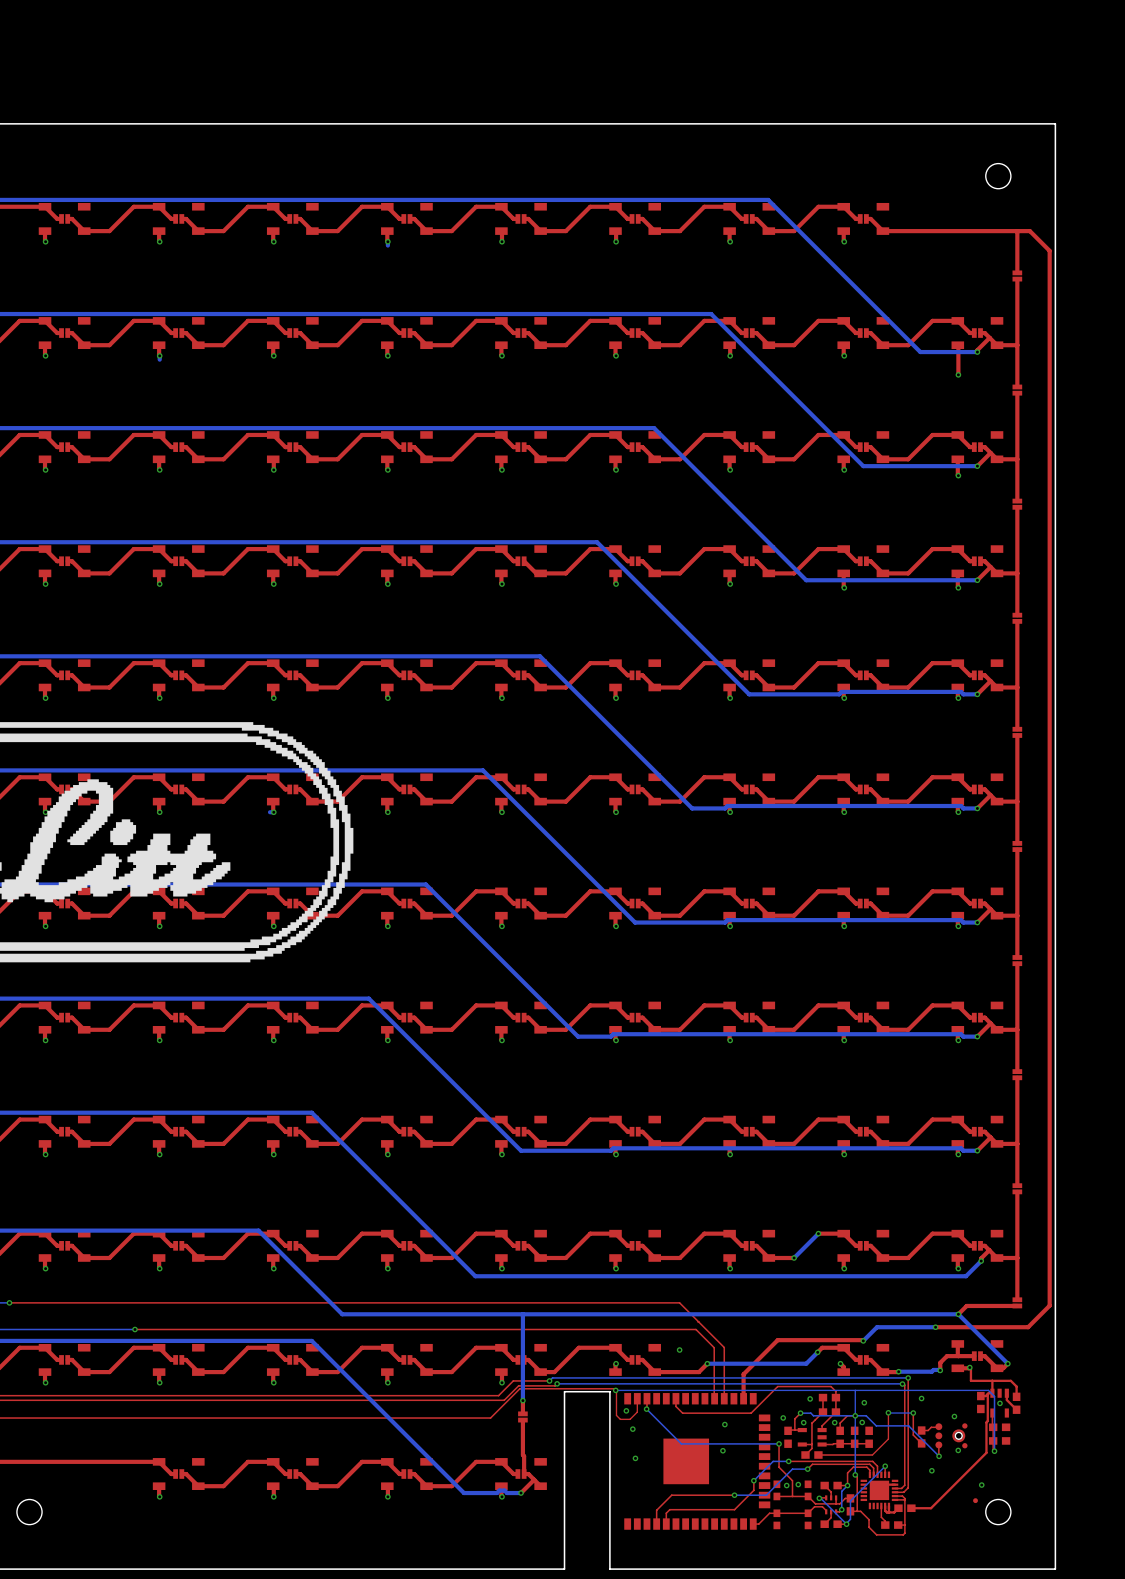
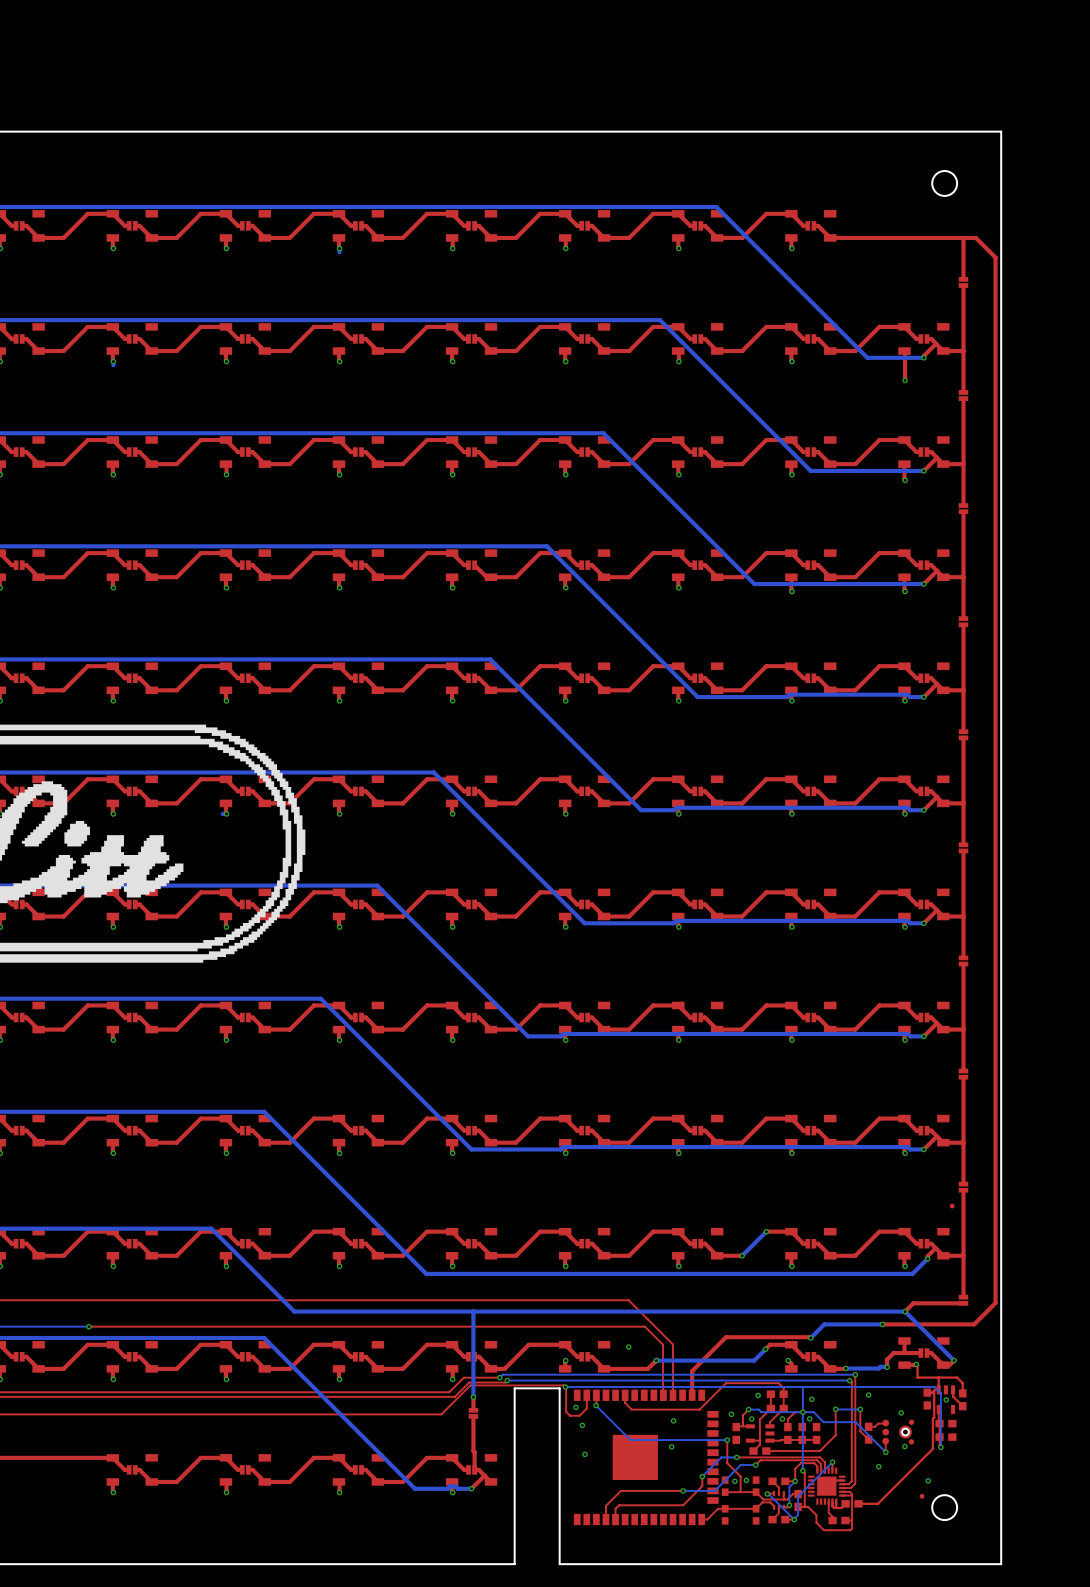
part: none -> (952, 1206)

